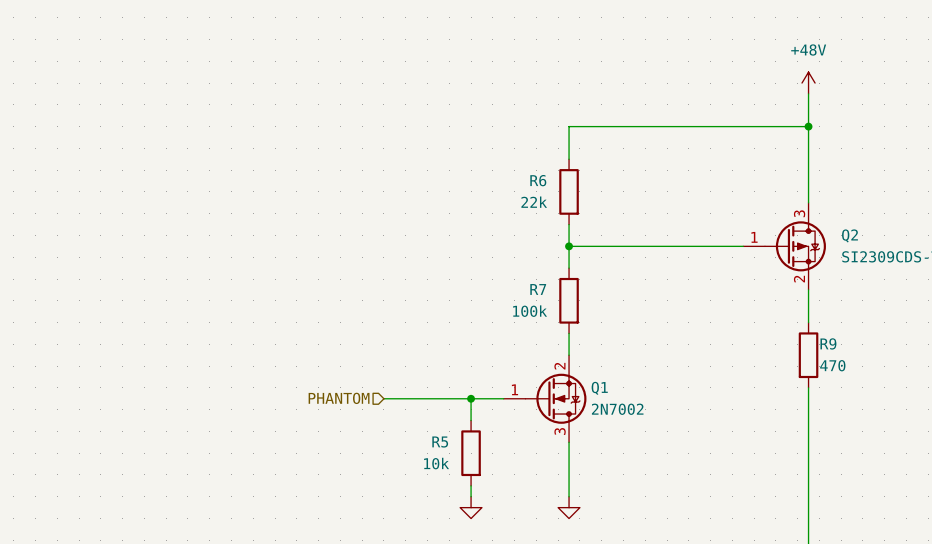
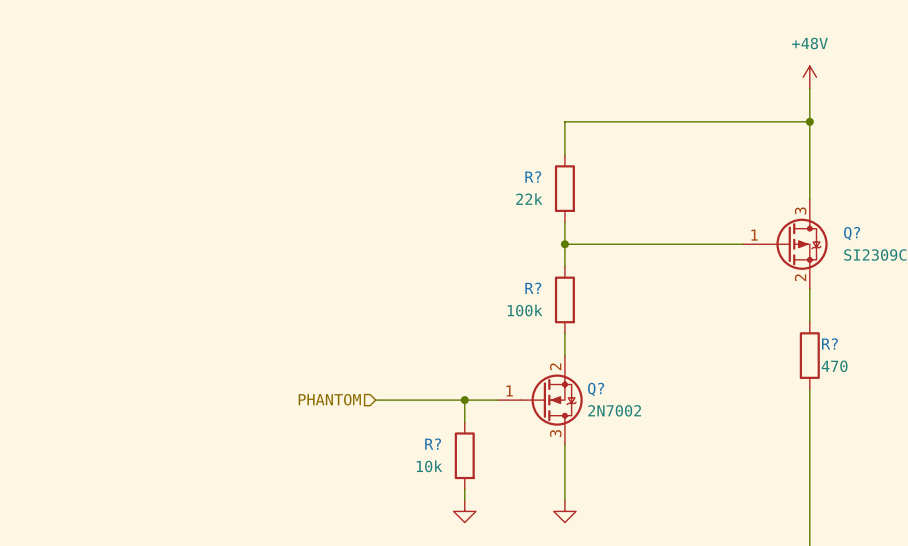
R6 name: R6 (538, 180) -> R? (533, 176)
Q2 name: Q2 (849, 235) -> Q? (852, 233)
R7 name: R7 (538, 289) -> R? (533, 288)
R9 name: R9 (828, 343) -> R? (829, 343)
Q1 name: Q1 (599, 388) -> Q? (596, 389)
R5 name: R5 (440, 442) -> R? (433, 444)

